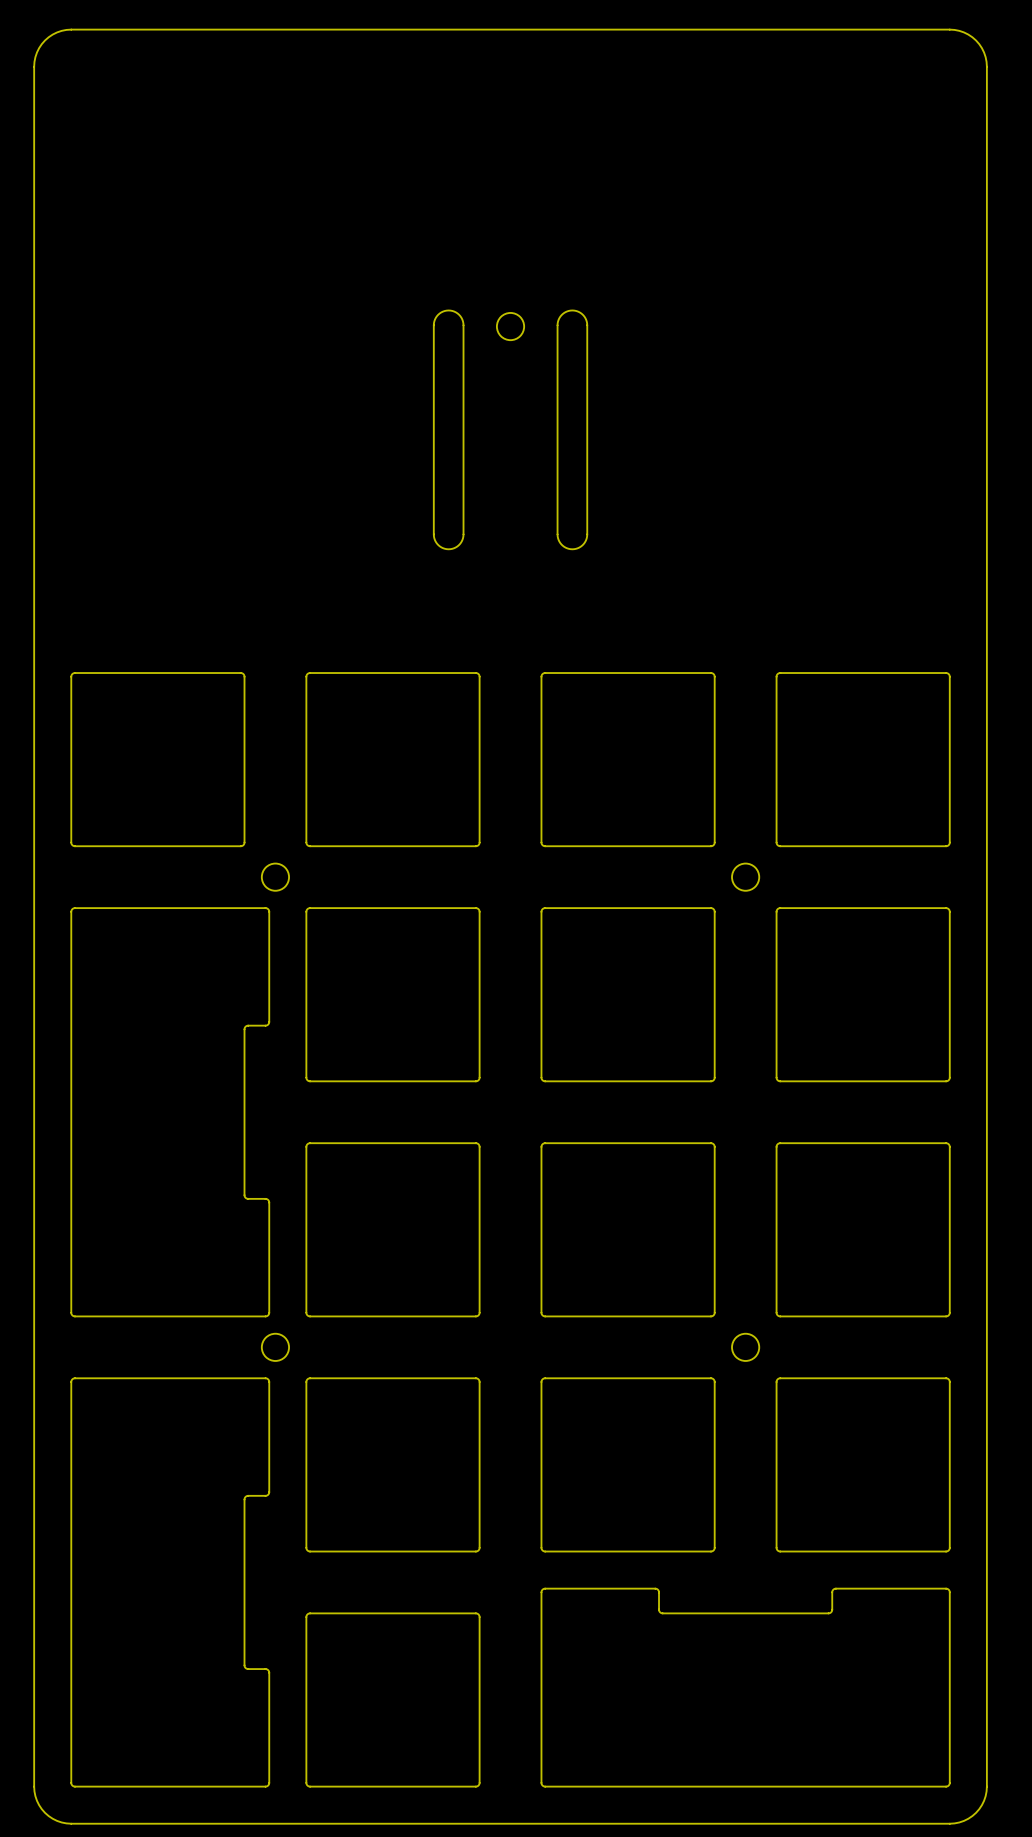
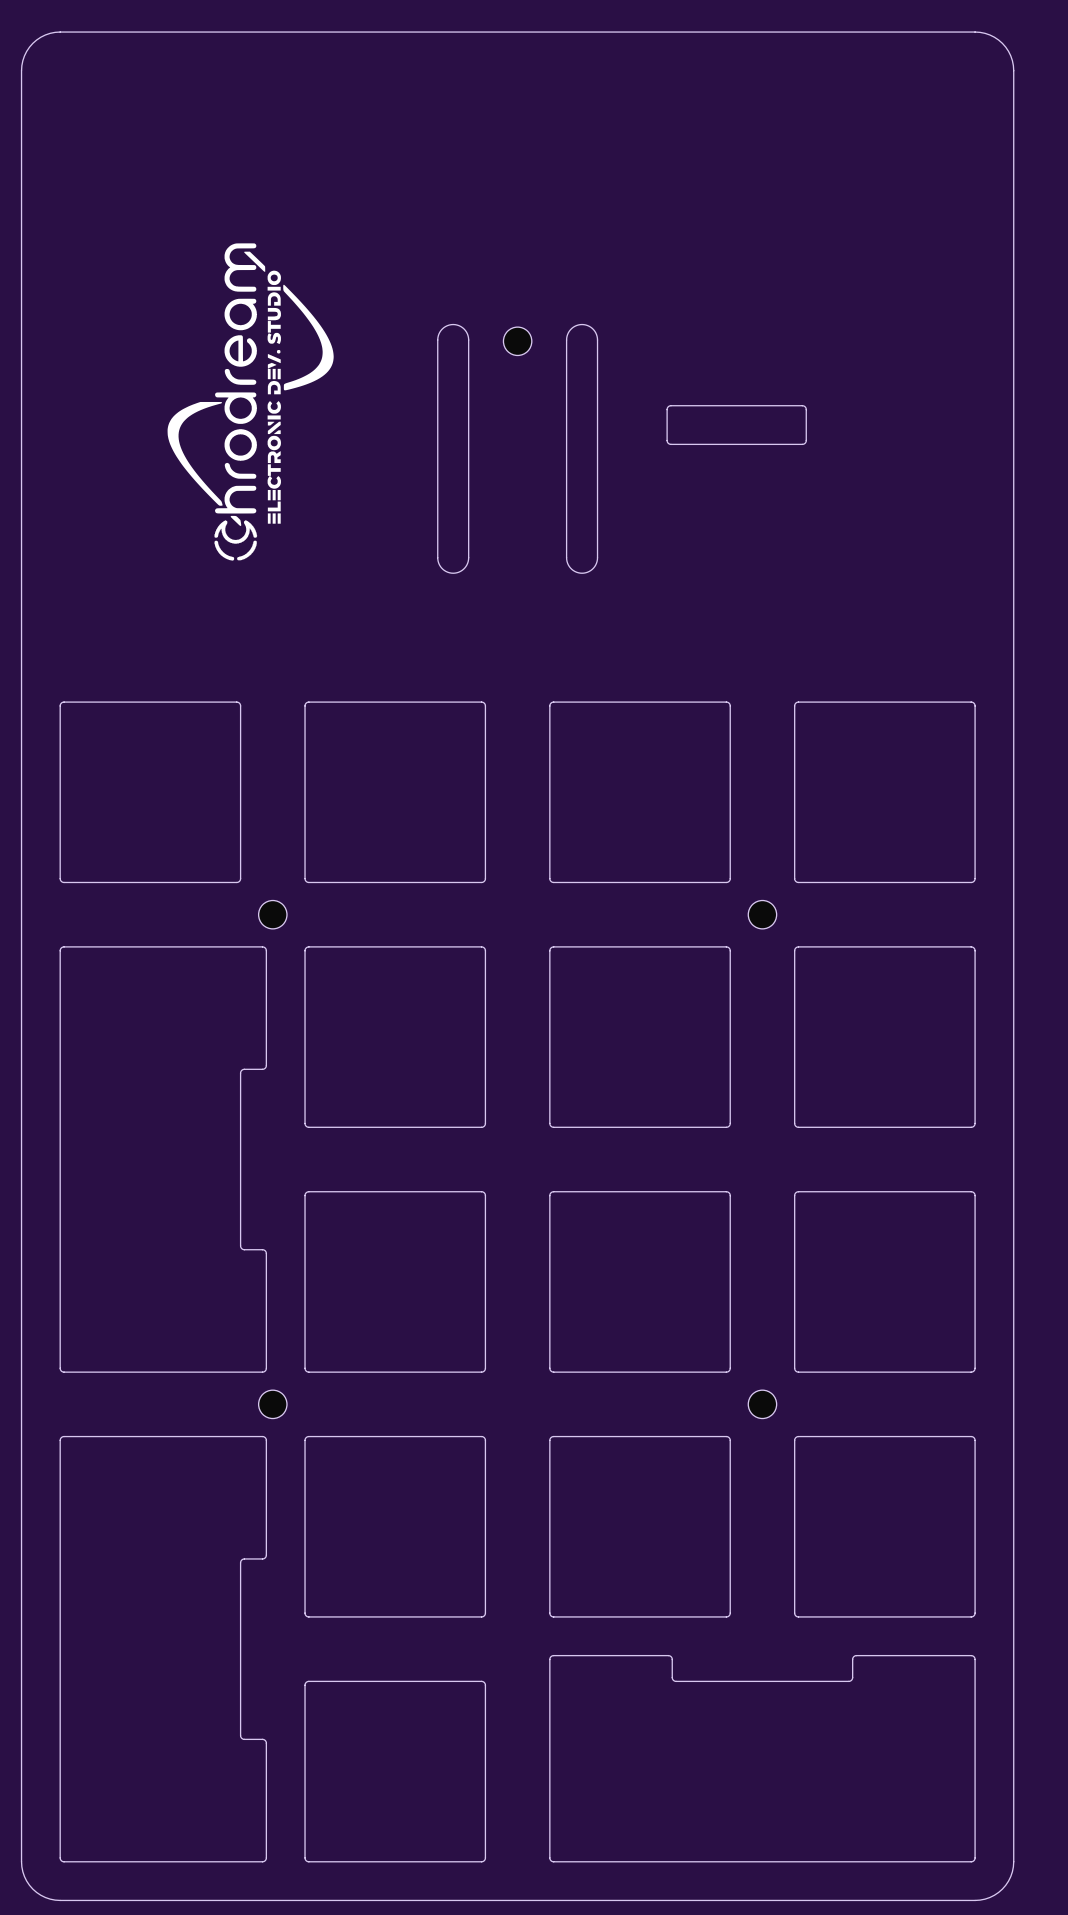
drawing: none -> [167, 243, 334, 561]
board edge: none -> (802, 405) (669, 405) (667, 409) (667, 441) (670, 444) (803, 444) (806, 441) (806, 409) (802, 405)

